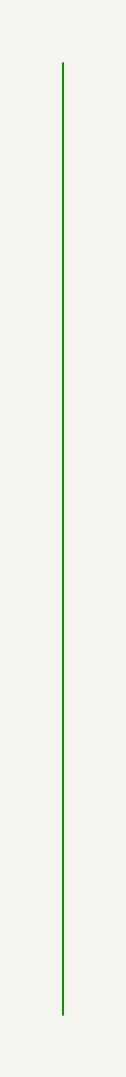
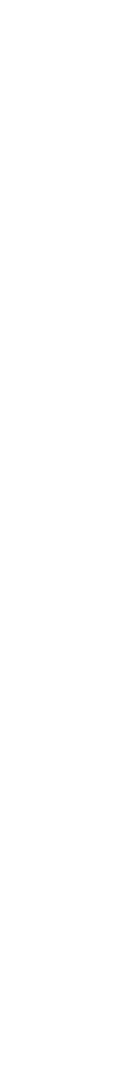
wire: (62, 62) (62, 1014) -> none

